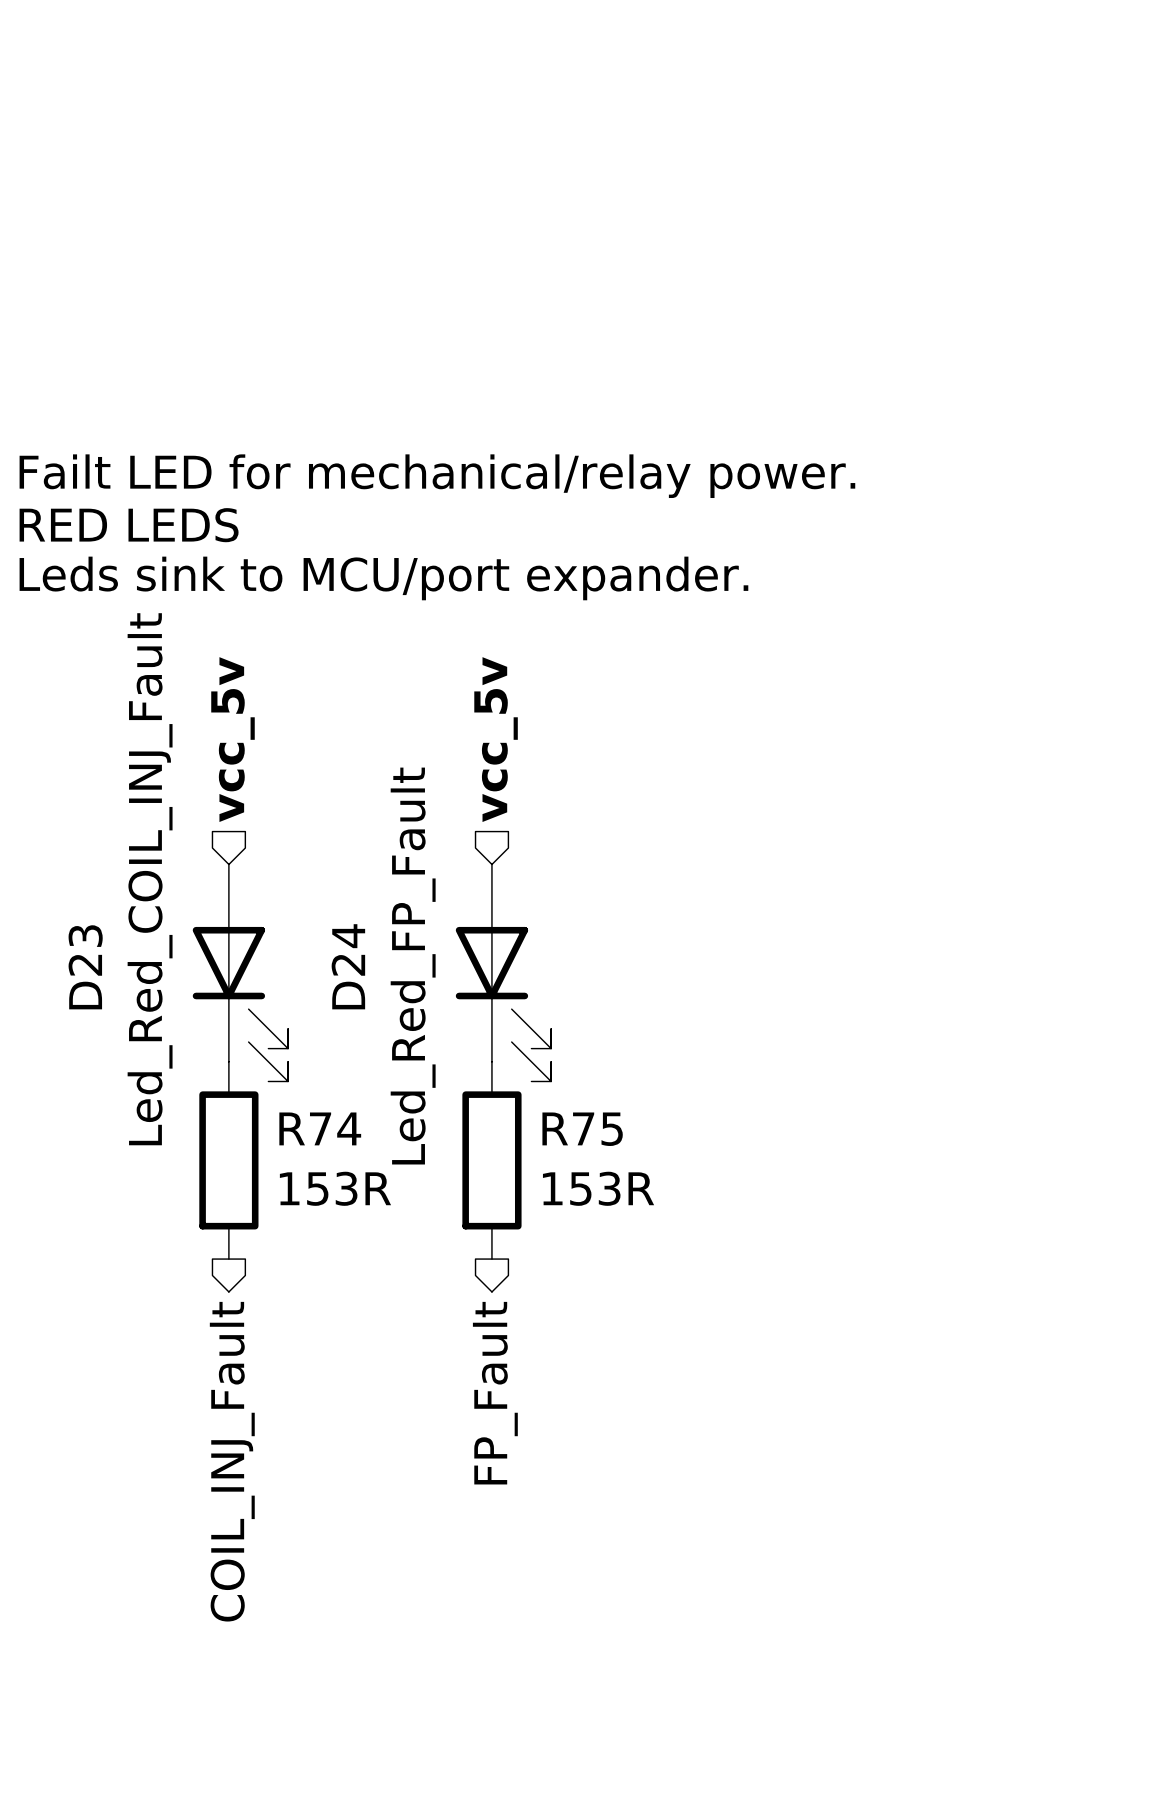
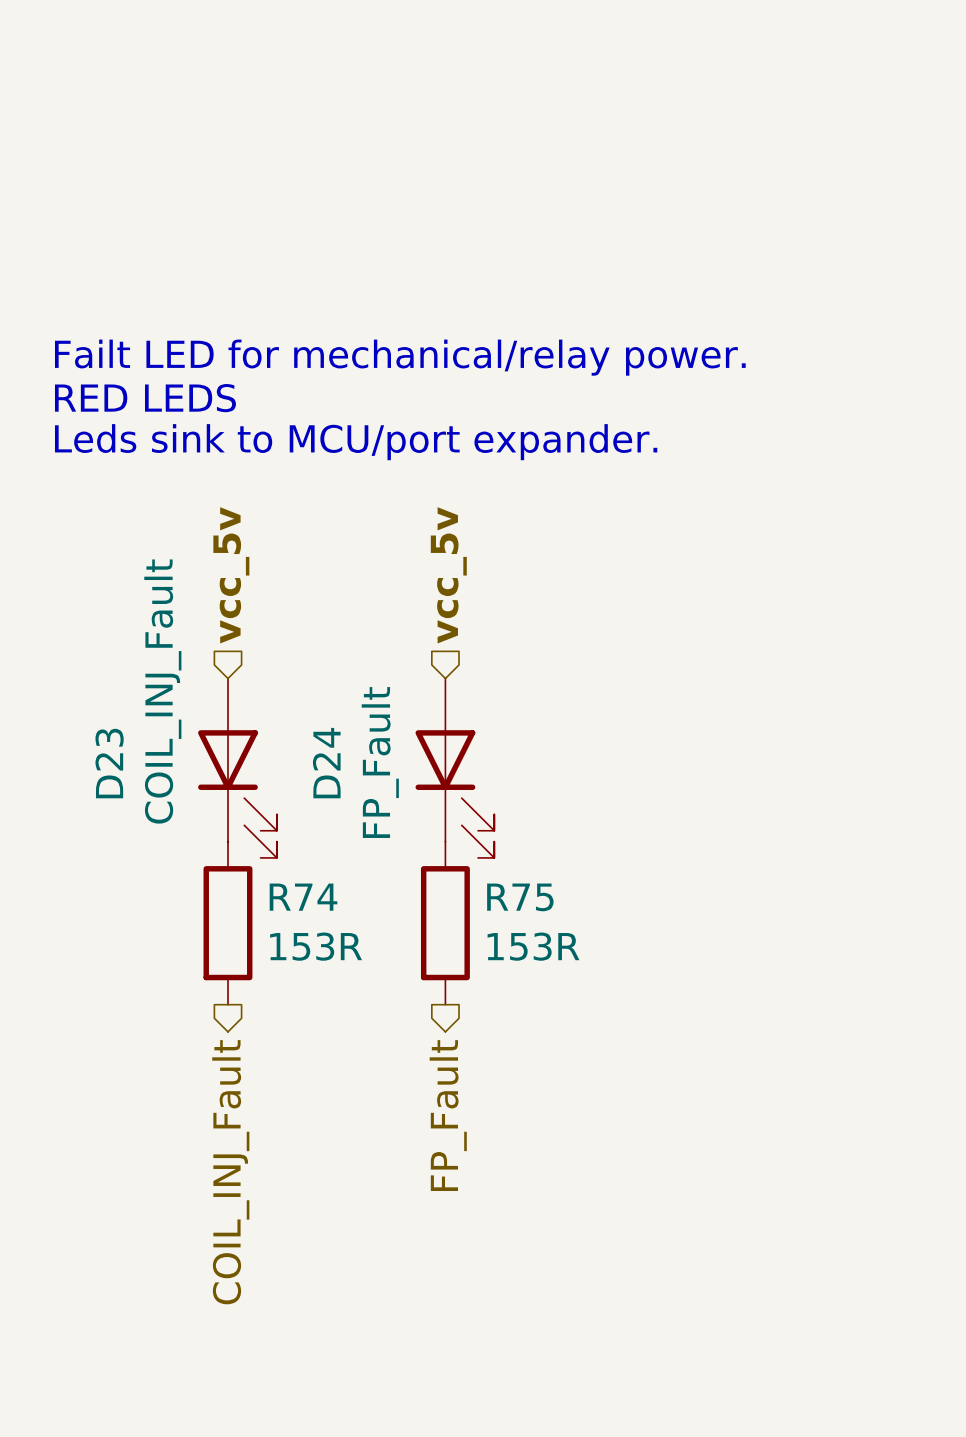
D23 value: Led_Red_COIL_INJ_Fault (150, 879) -> COIL_INJ_Fault (162, 691)
D24 value: Led_Red_FP_Fault (413, 966) -> FP_Fault (380, 762)

